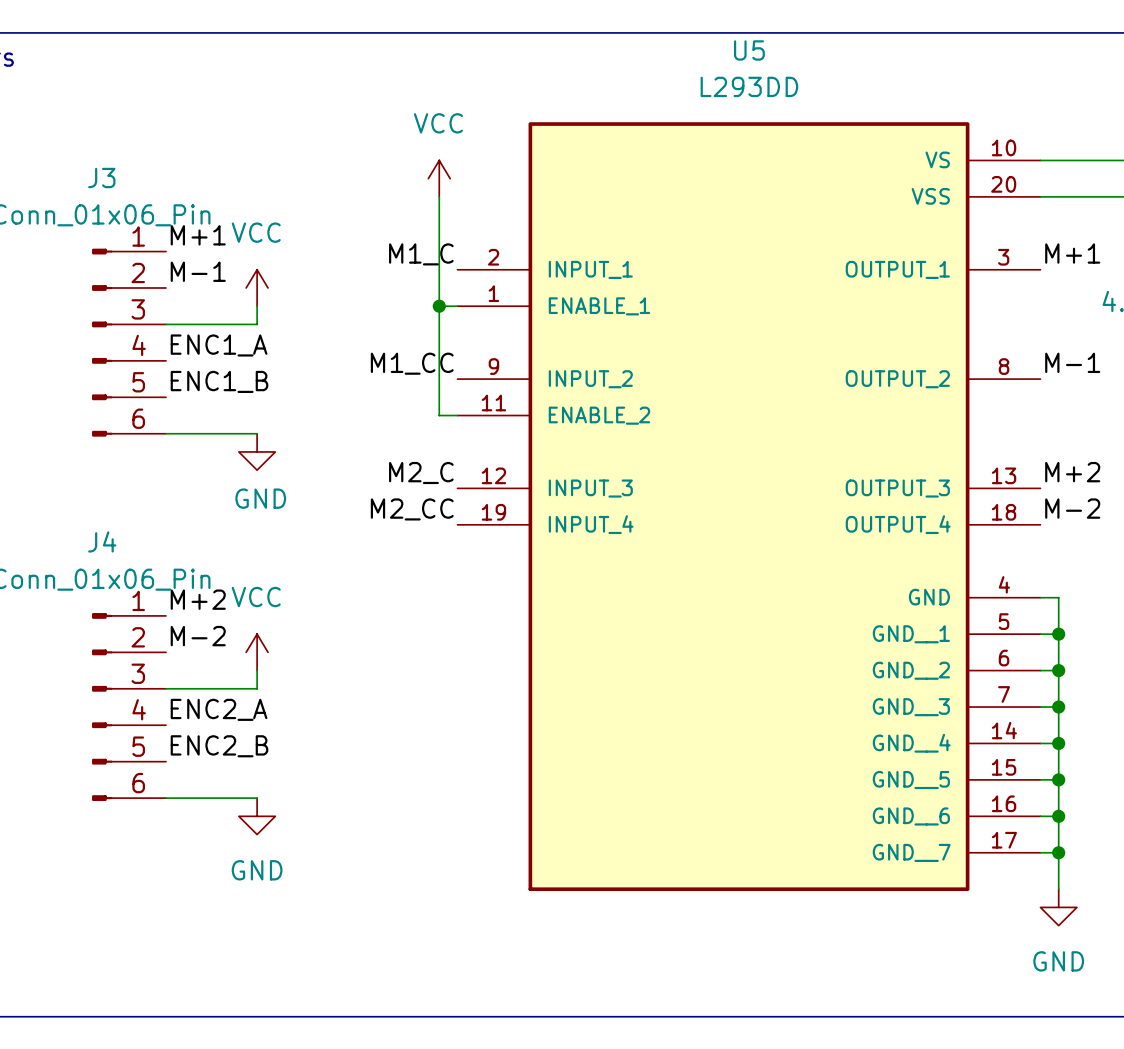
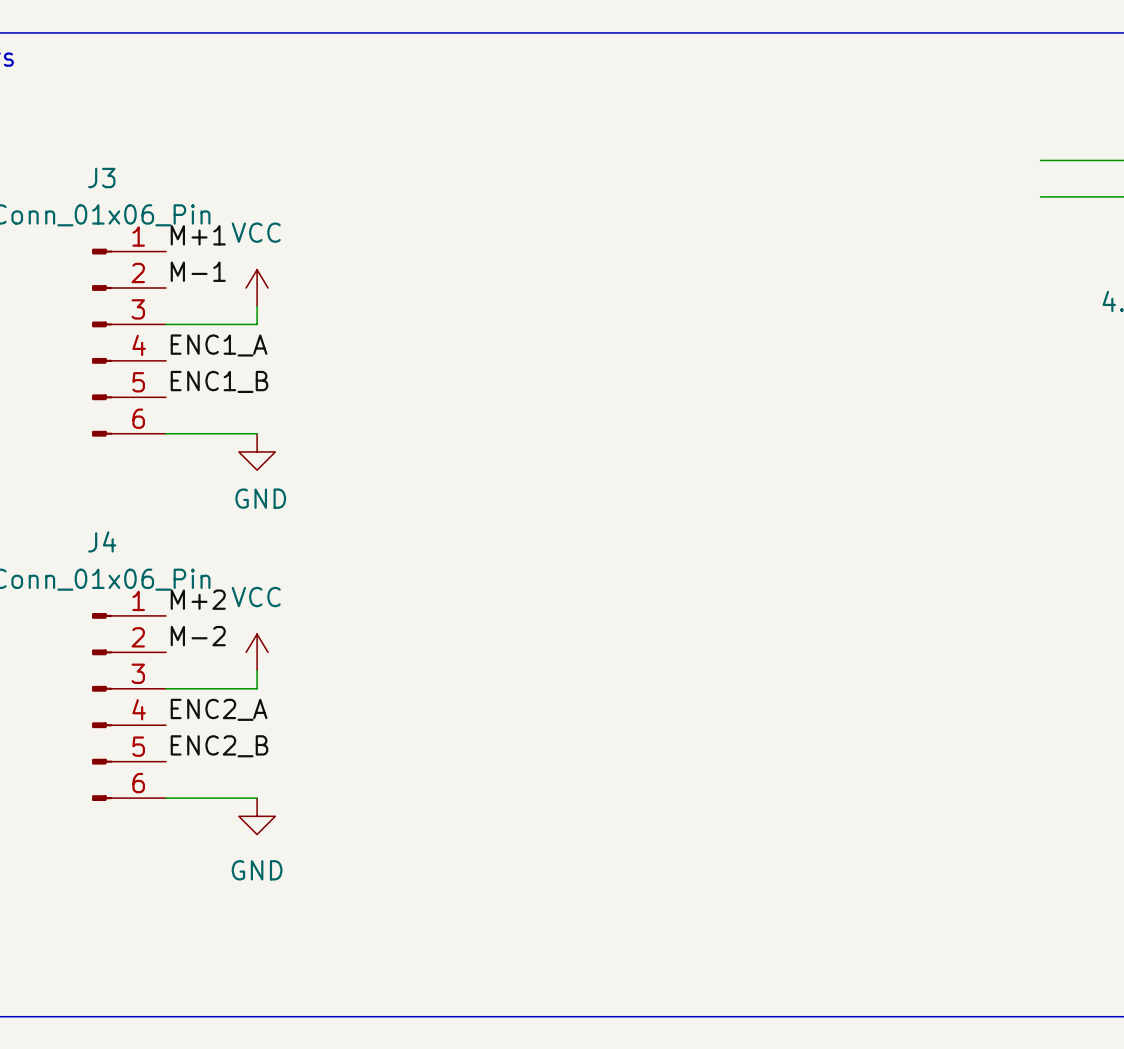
power symbol: VCC (439, 178) -> none
wire: (439, 196) (439, 415) (457, 415) -> none
label: M+1 (1072, 253) -> none
label: M1_C (421, 254) -> none
wire: (439, 306) (457, 306) -> none
junction: (439, 306) -> none
label: M-1 (1072, 362) -> none
label: M1_CC (412, 363) -> none
label: M+2 (1072, 472) -> none
label: M2_C (421, 473) -> none
U5: L293DD (748, 506) -> none
label: M-2 (1072, 508) -> none
label: M2_CC (412, 509) -> none
wire: (1040, 597) (1058, 597) (1058, 889) -> none
wire: (1040, 634) (1058, 634) -> none
junction: (1058, 634) -> none
wire: (1040, 670) (1058, 670) -> none
junction: (1058, 670) -> none
wire: (1040, 707) (1058, 707) -> none
junction: (1058, 707) -> none
wire: (1040, 743) (1058, 743) -> none
junction: (1058, 743) -> none
wire: (1040, 779) (1058, 779) -> none
junction: (1058, 779) -> none
wire: (1040, 816) (1058, 816) -> none
junction: (1058, 816) -> none
wire: (1040, 852) (1058, 852) -> none
junction: (1058, 852) -> none
power symbol: GND (1058, 907) -> none

